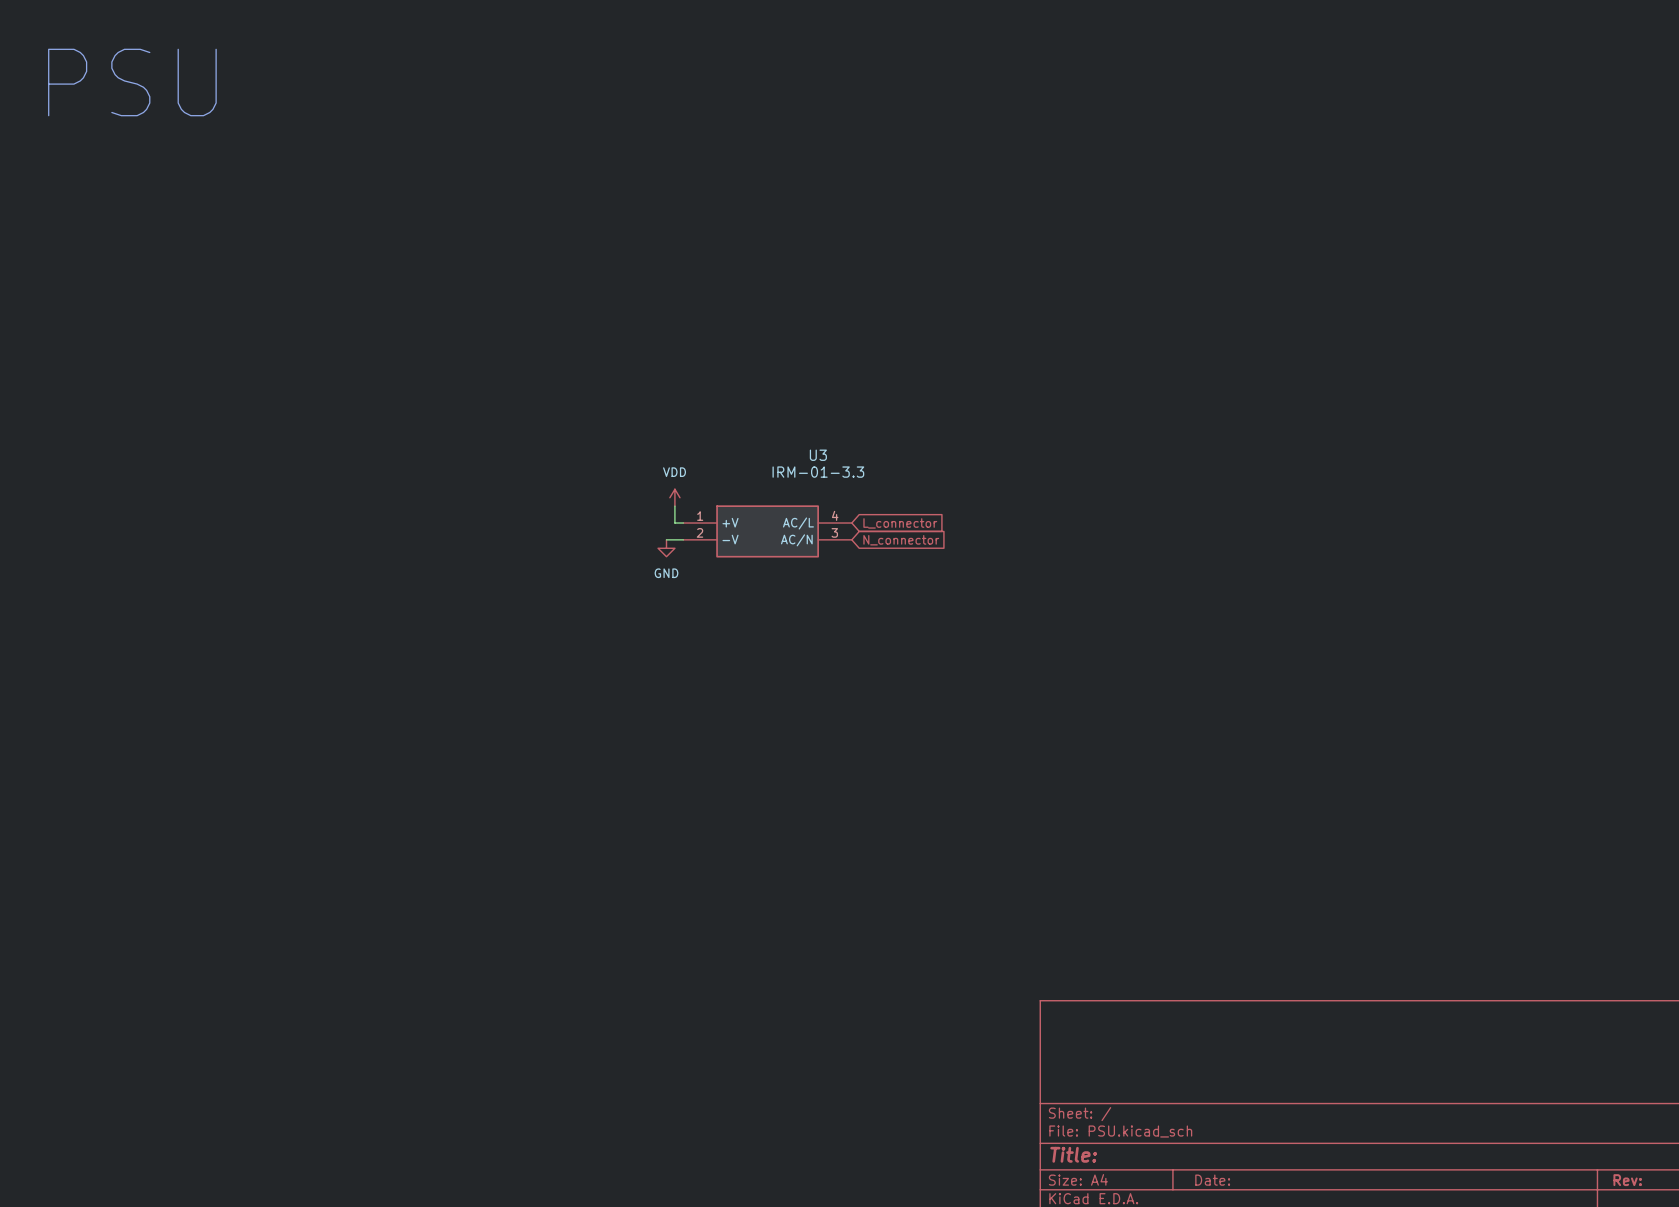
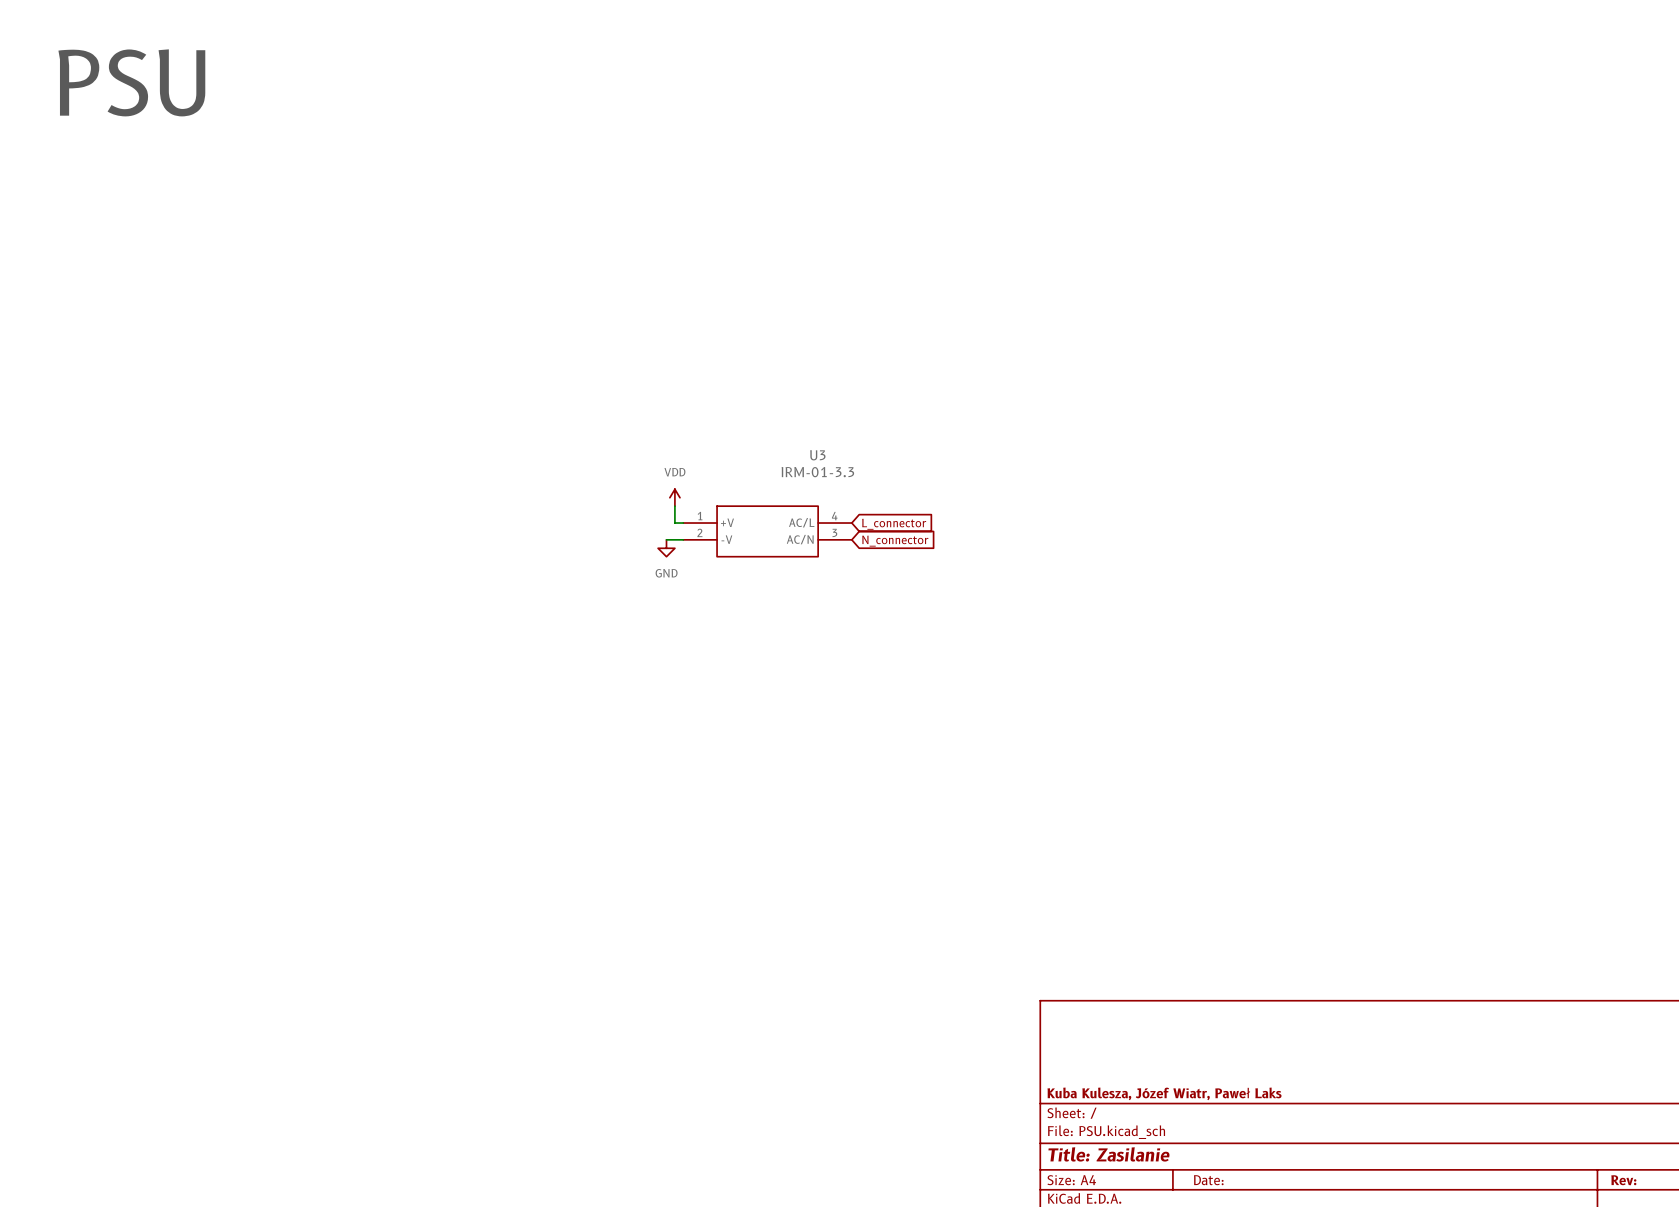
title block: none -> Kuba Kulesza, Józef Wiatr, Paweł Laks (1164, 1093)
title block: Title: (1073, 1154) -> Title: Zasilanie (1108, 1154)

